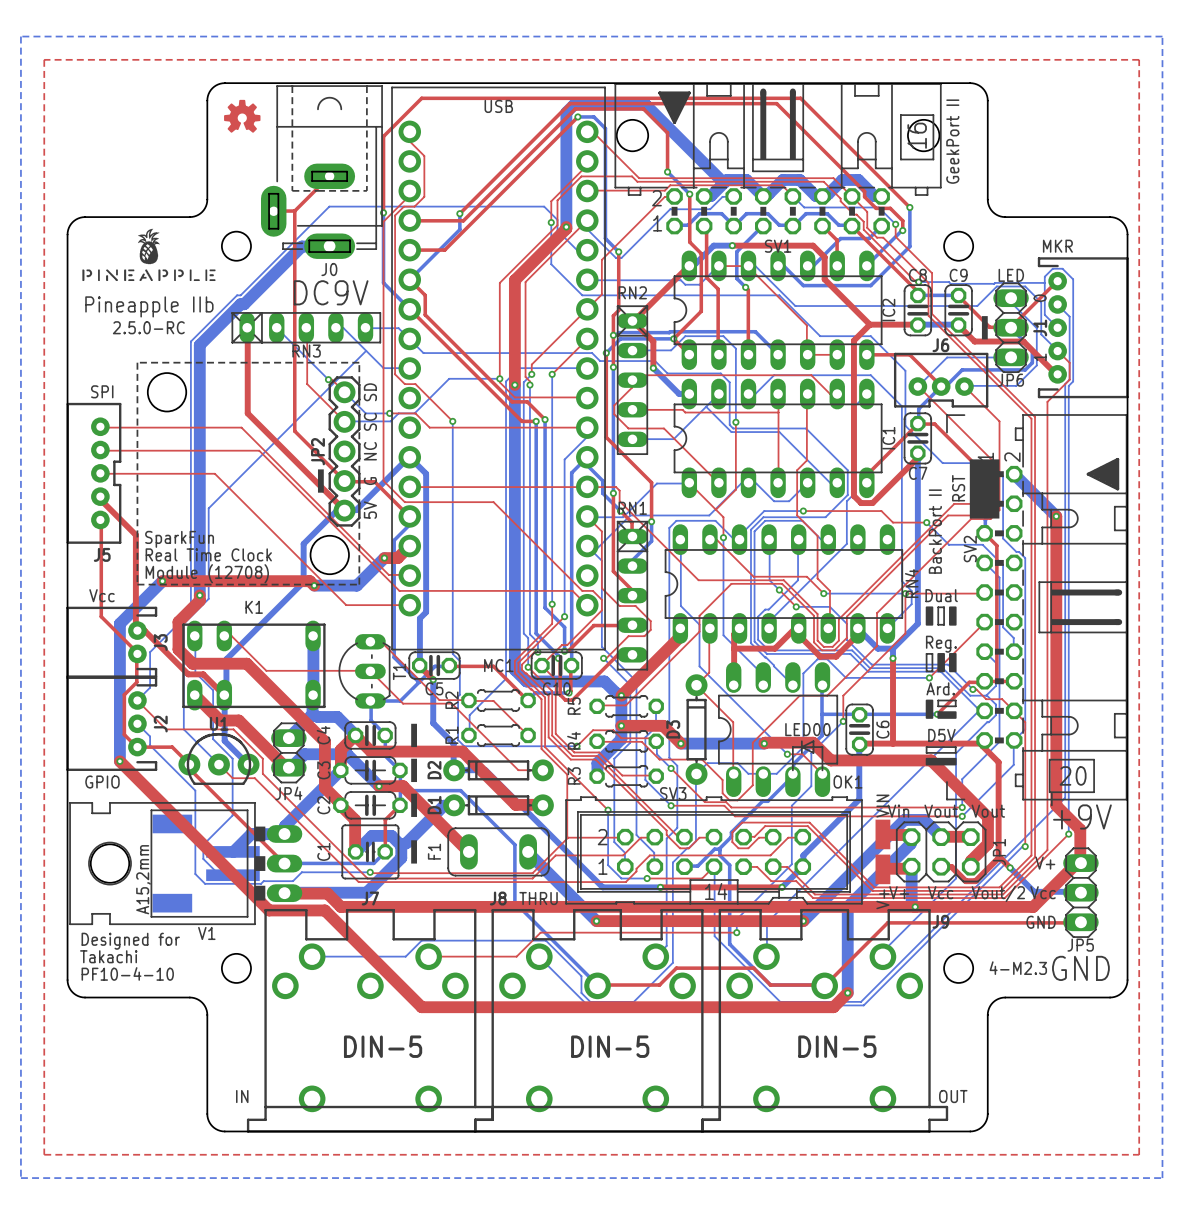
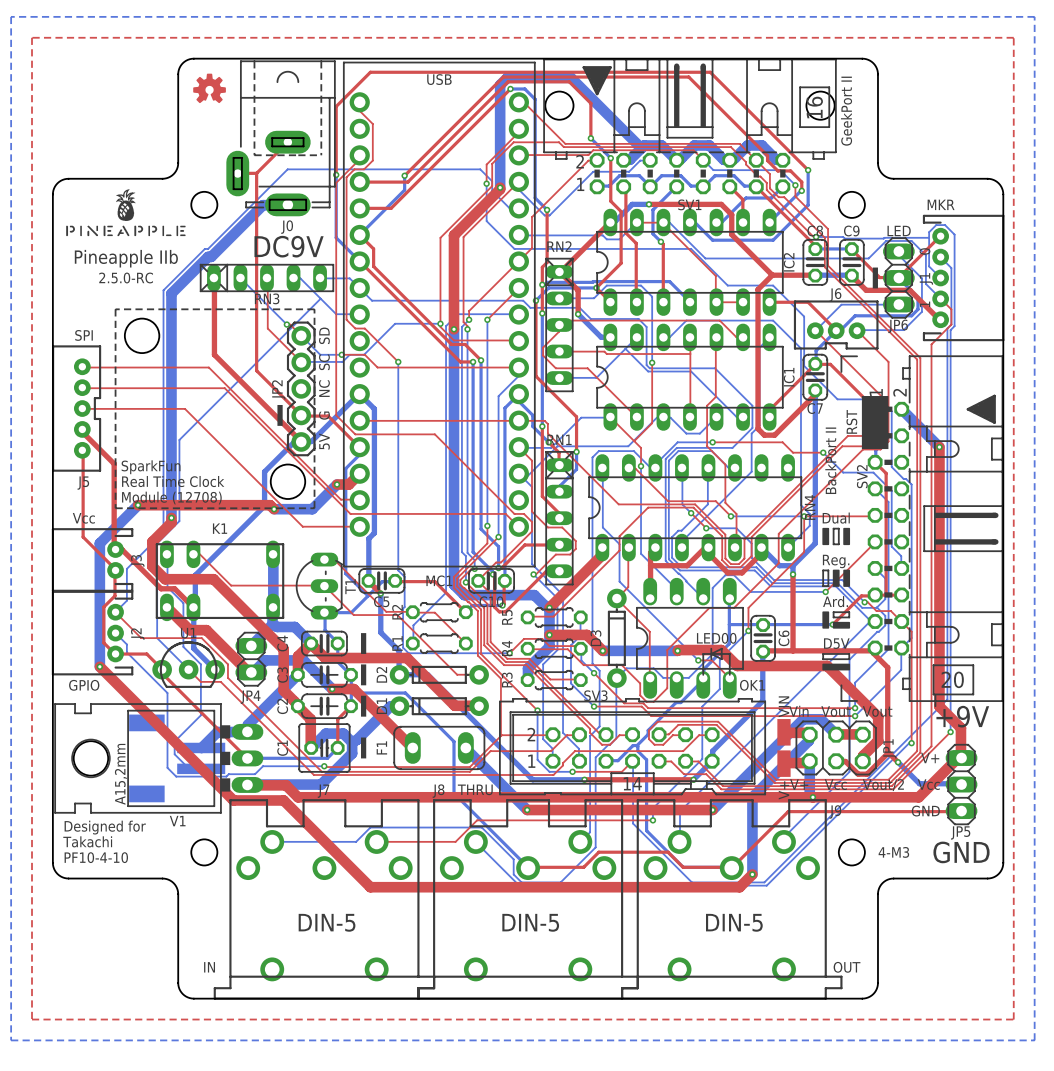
text: 4-M2.3 (1018, 968) -> 4-M3 (893, 852)

